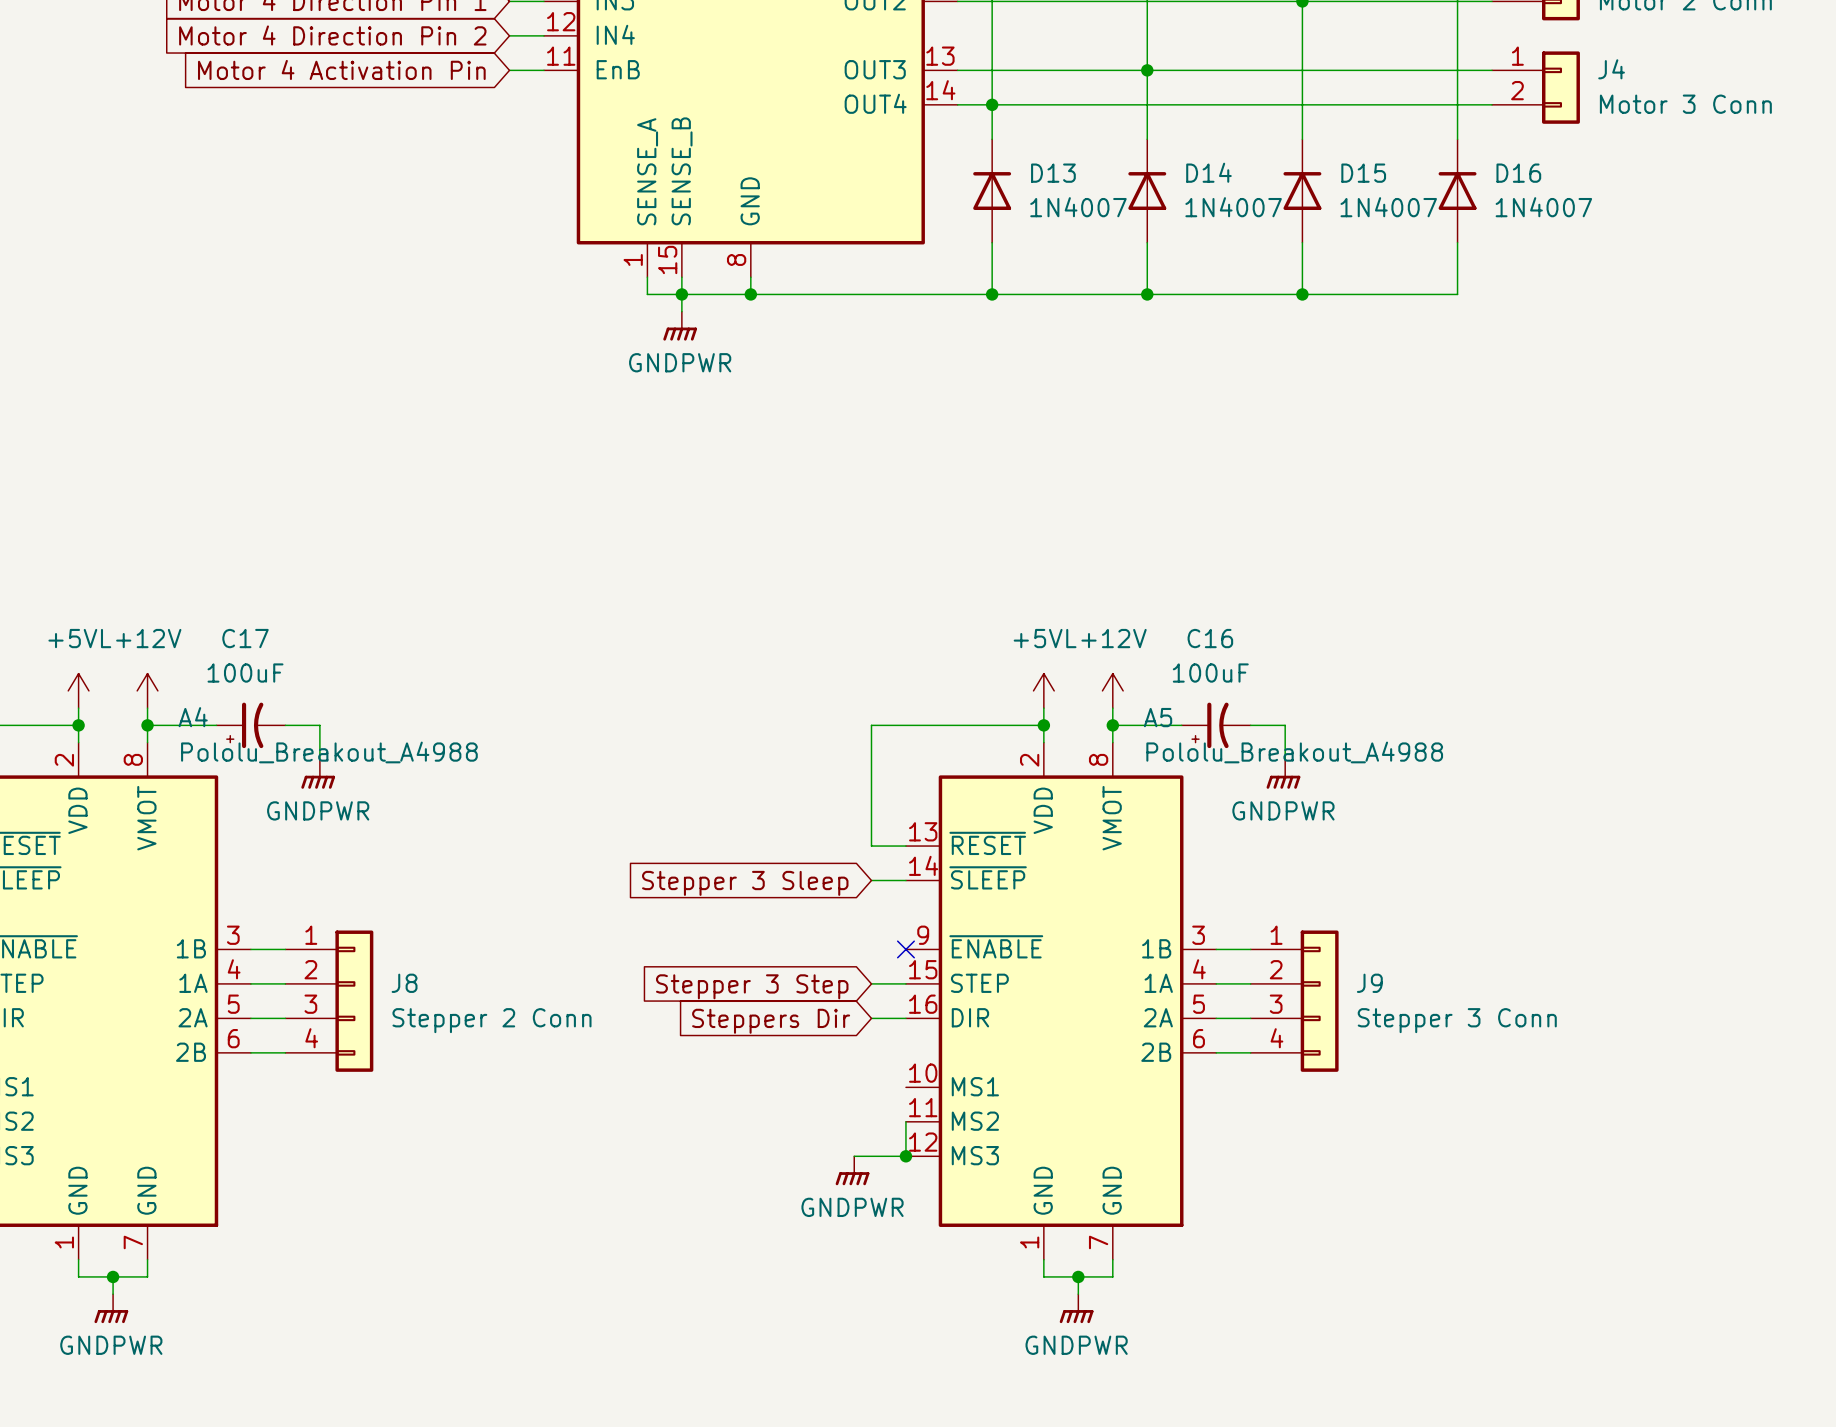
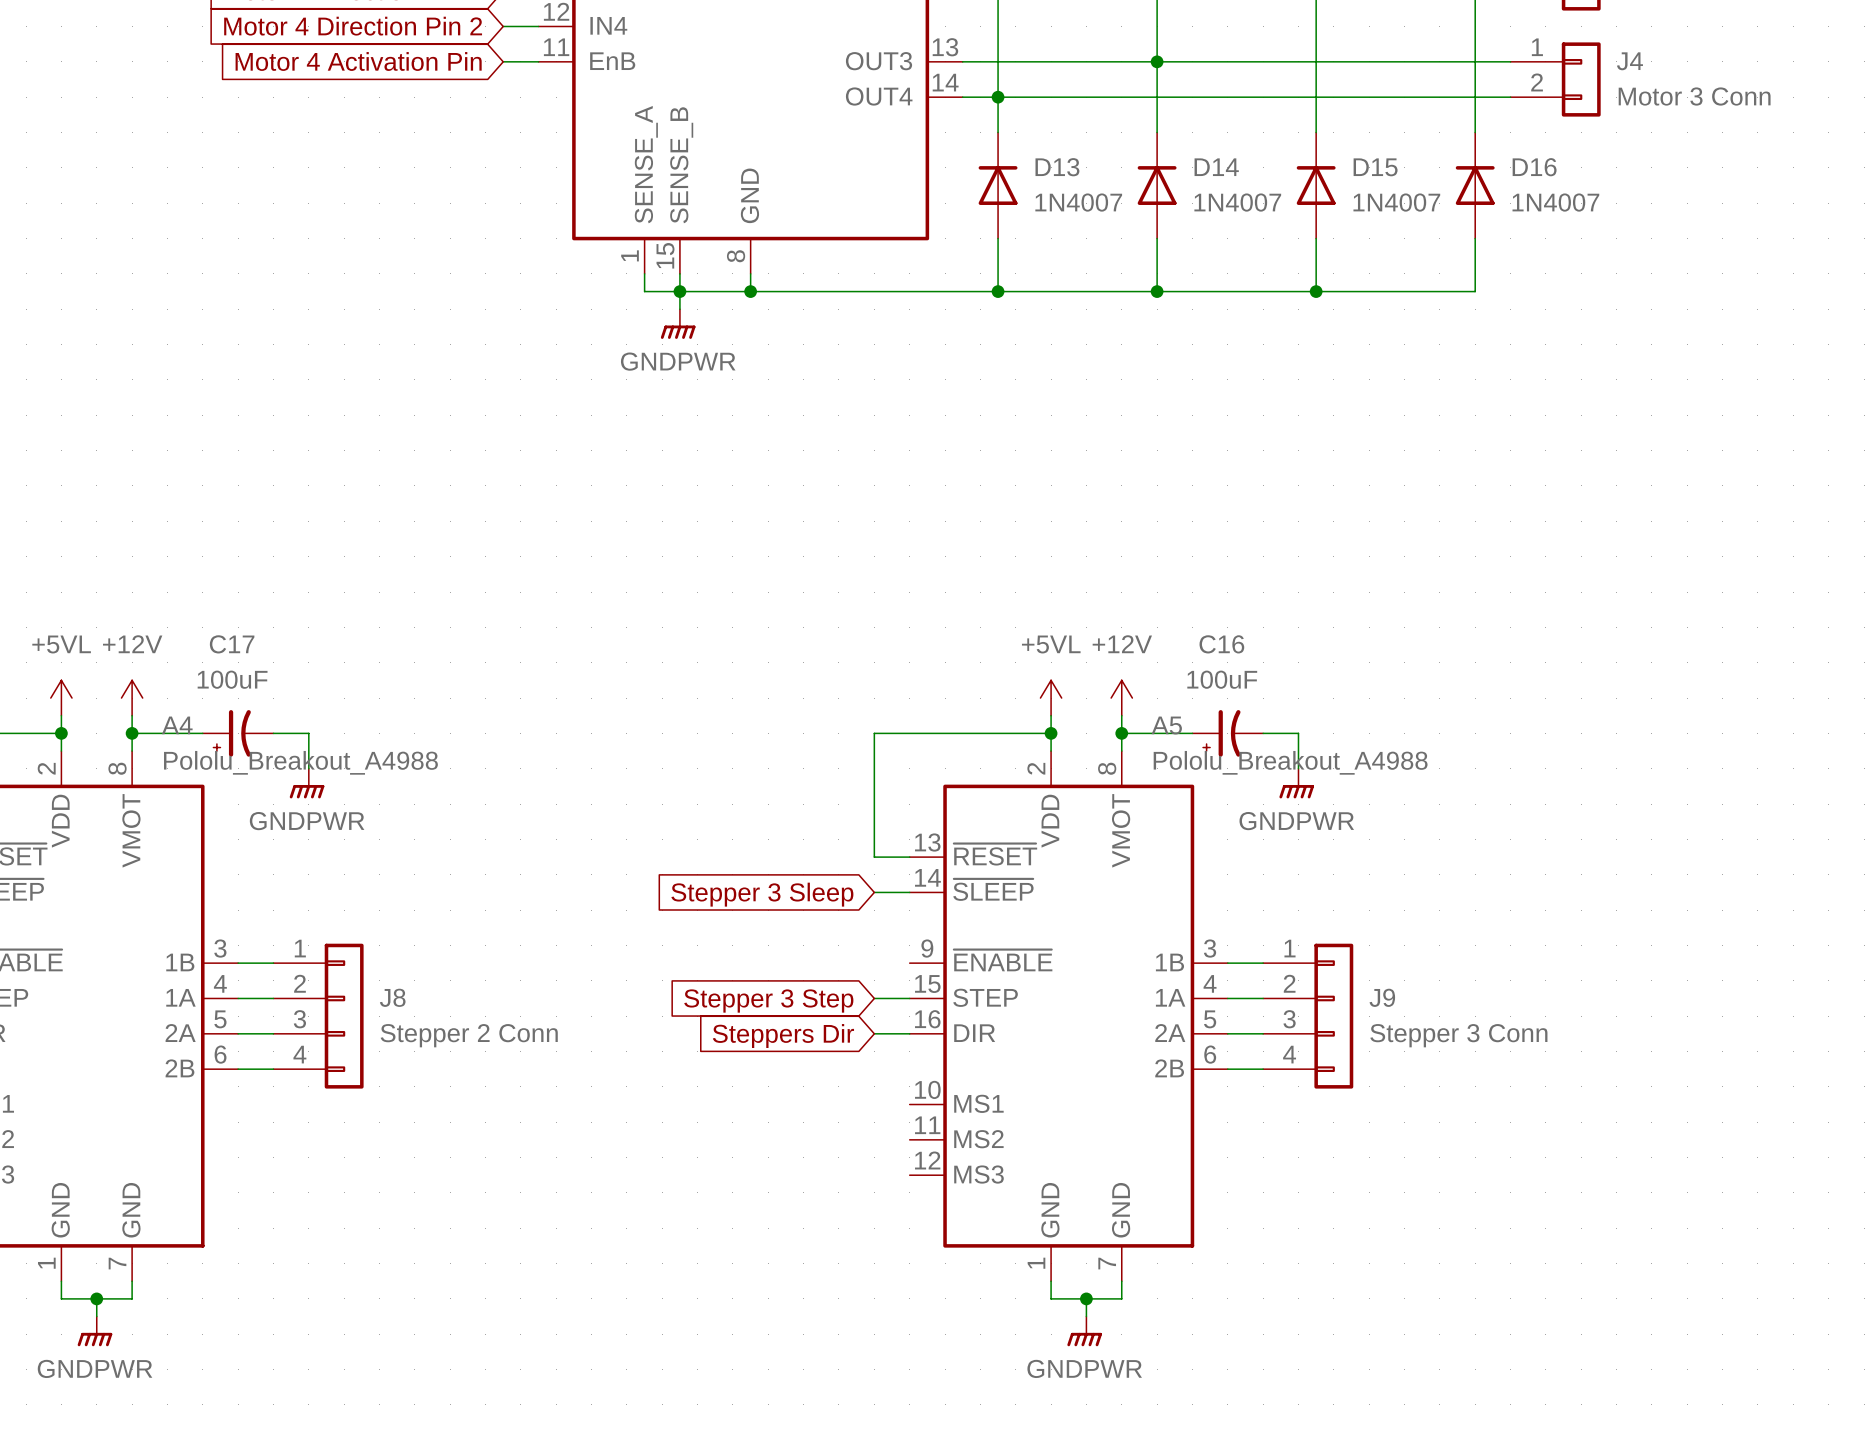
no-connect mark: (905, 949) -> none
wire: (905, 1121) (905, 1156) (854, 1156) -> none
junction: (905, 1156) -> none
power symbol: GNDPWR (852, 1170) -> none

